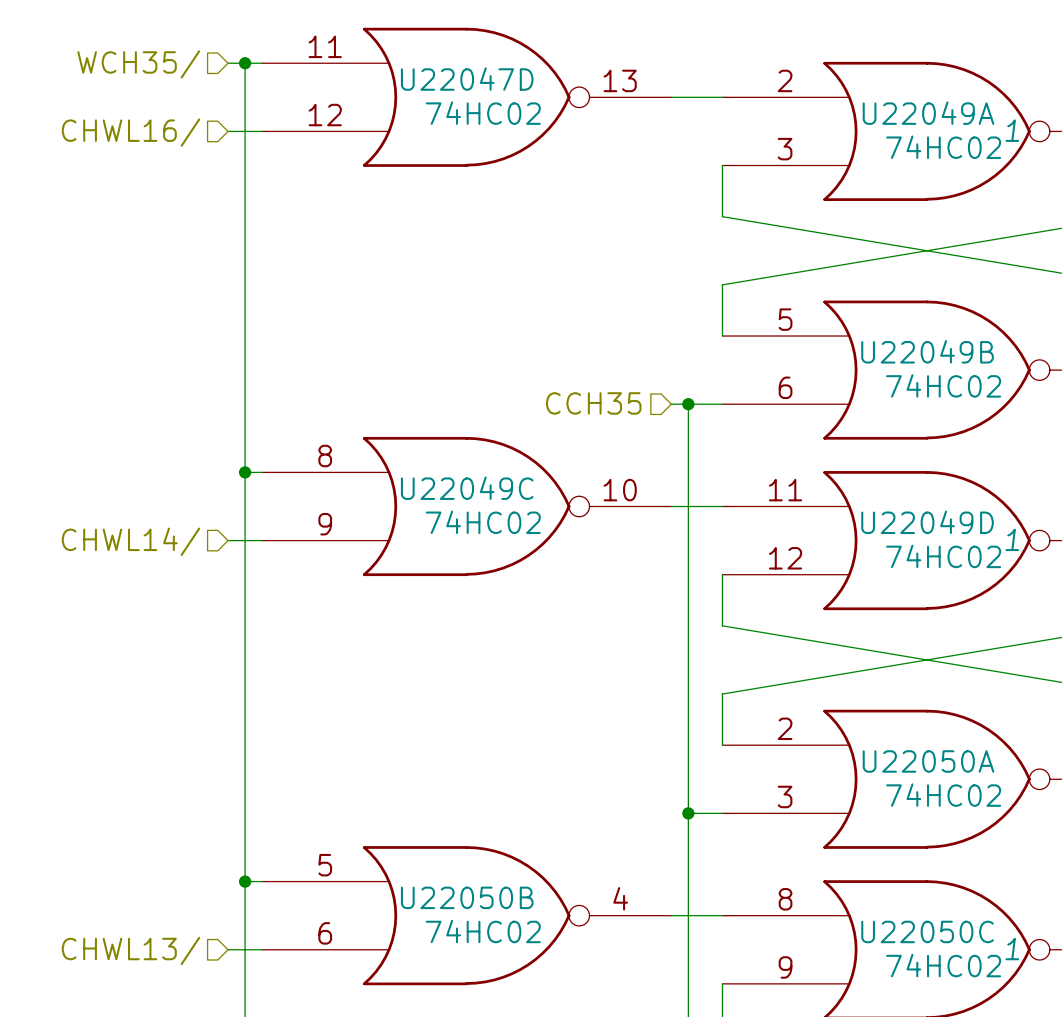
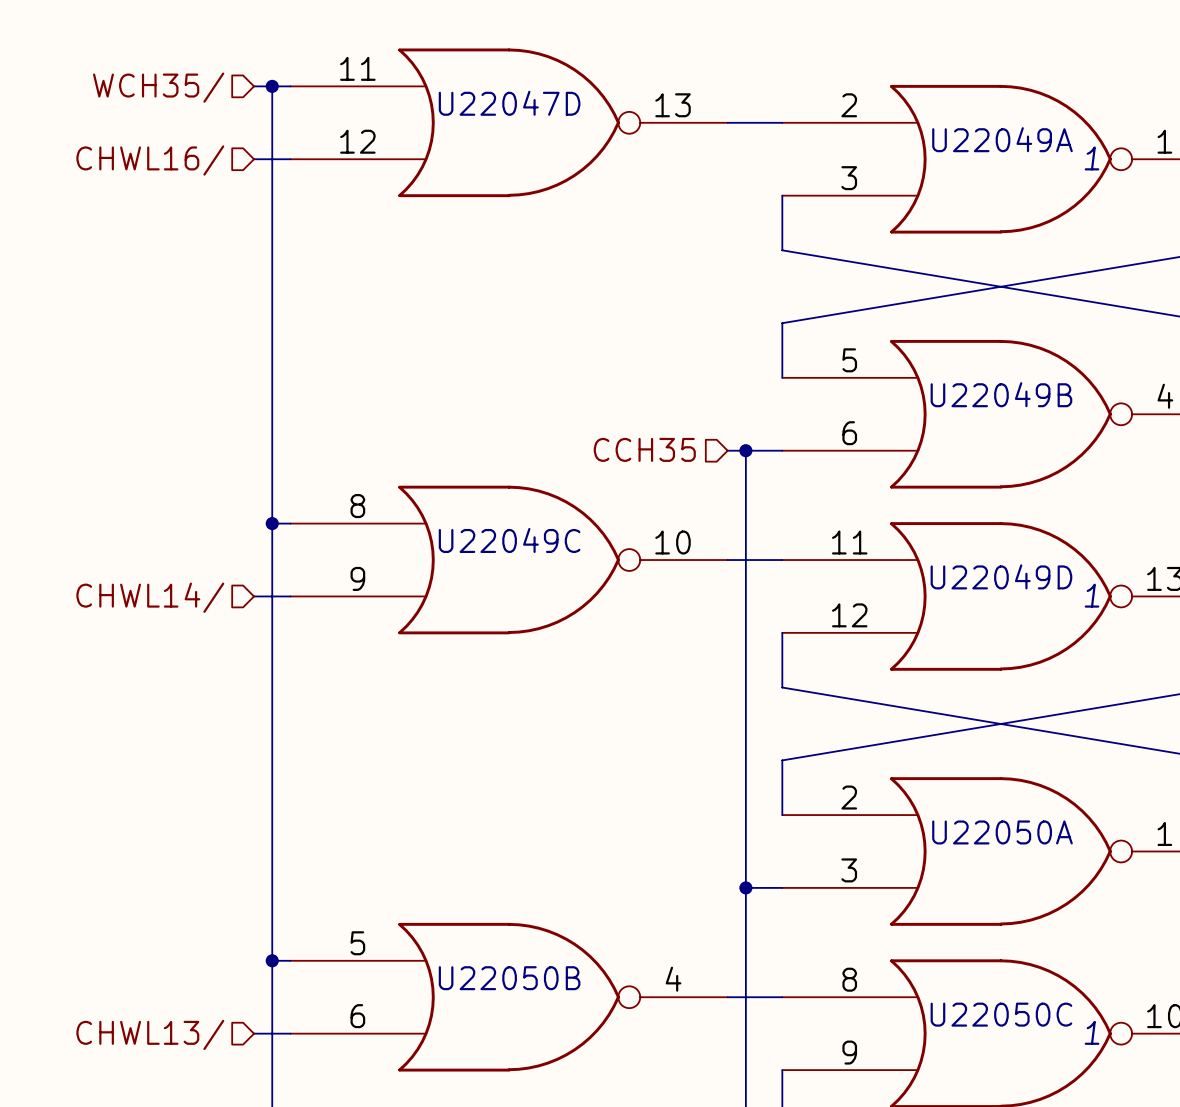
U22047D value: 74HC02 (483, 113) -> none
U22049A value: 74HC02 (943, 147) -> none
U22049B value: 74HC02 (943, 385) -> none
U22049C value: 74HC02 (483, 522) -> none
U22049D value: 74HC02 (943, 556) -> none
U22050A value: 74HC02 (943, 795) -> none
U22050B value: 74HC02 (483, 931) -> none
U22050C value: 74HC02 (943, 965) -> none

